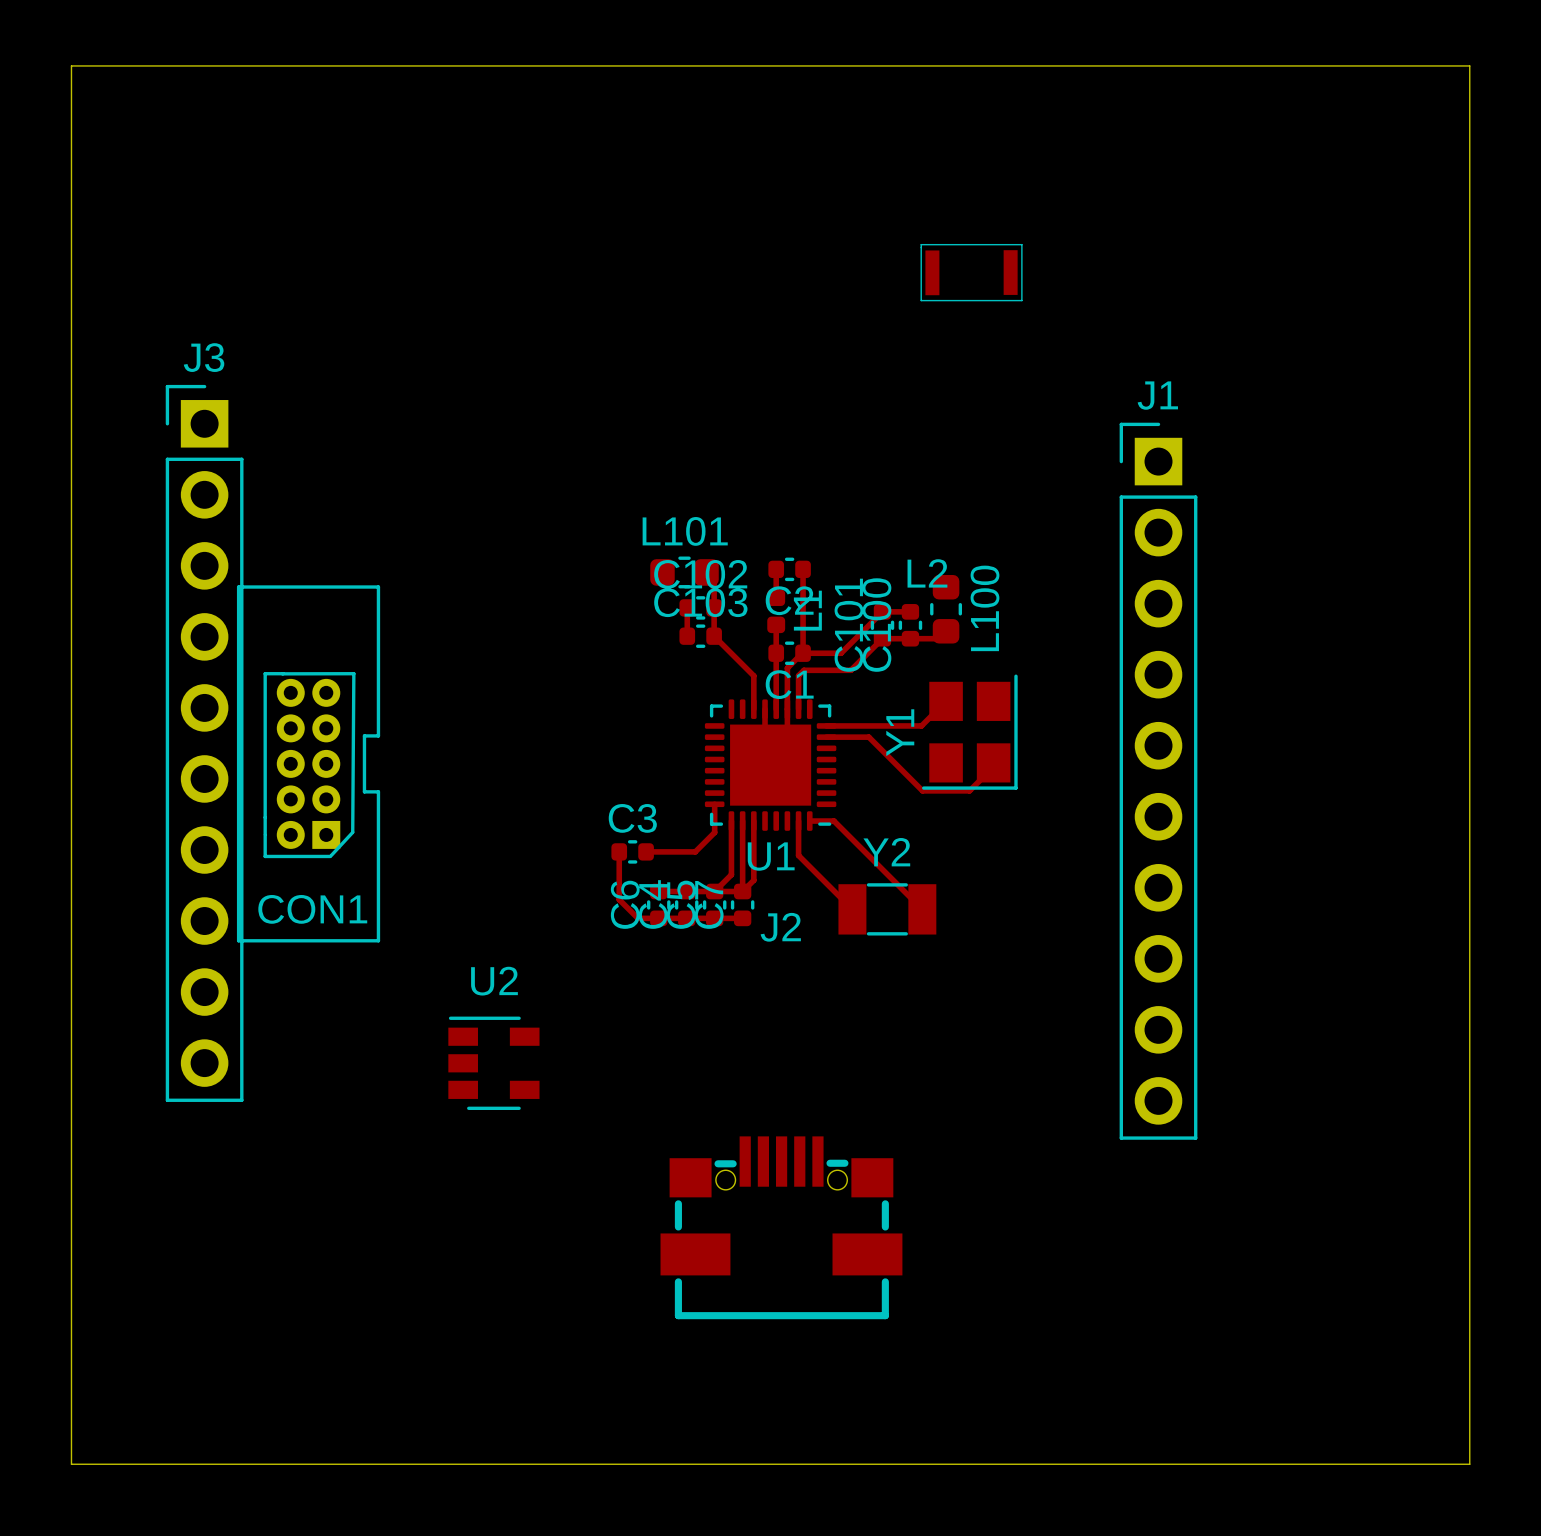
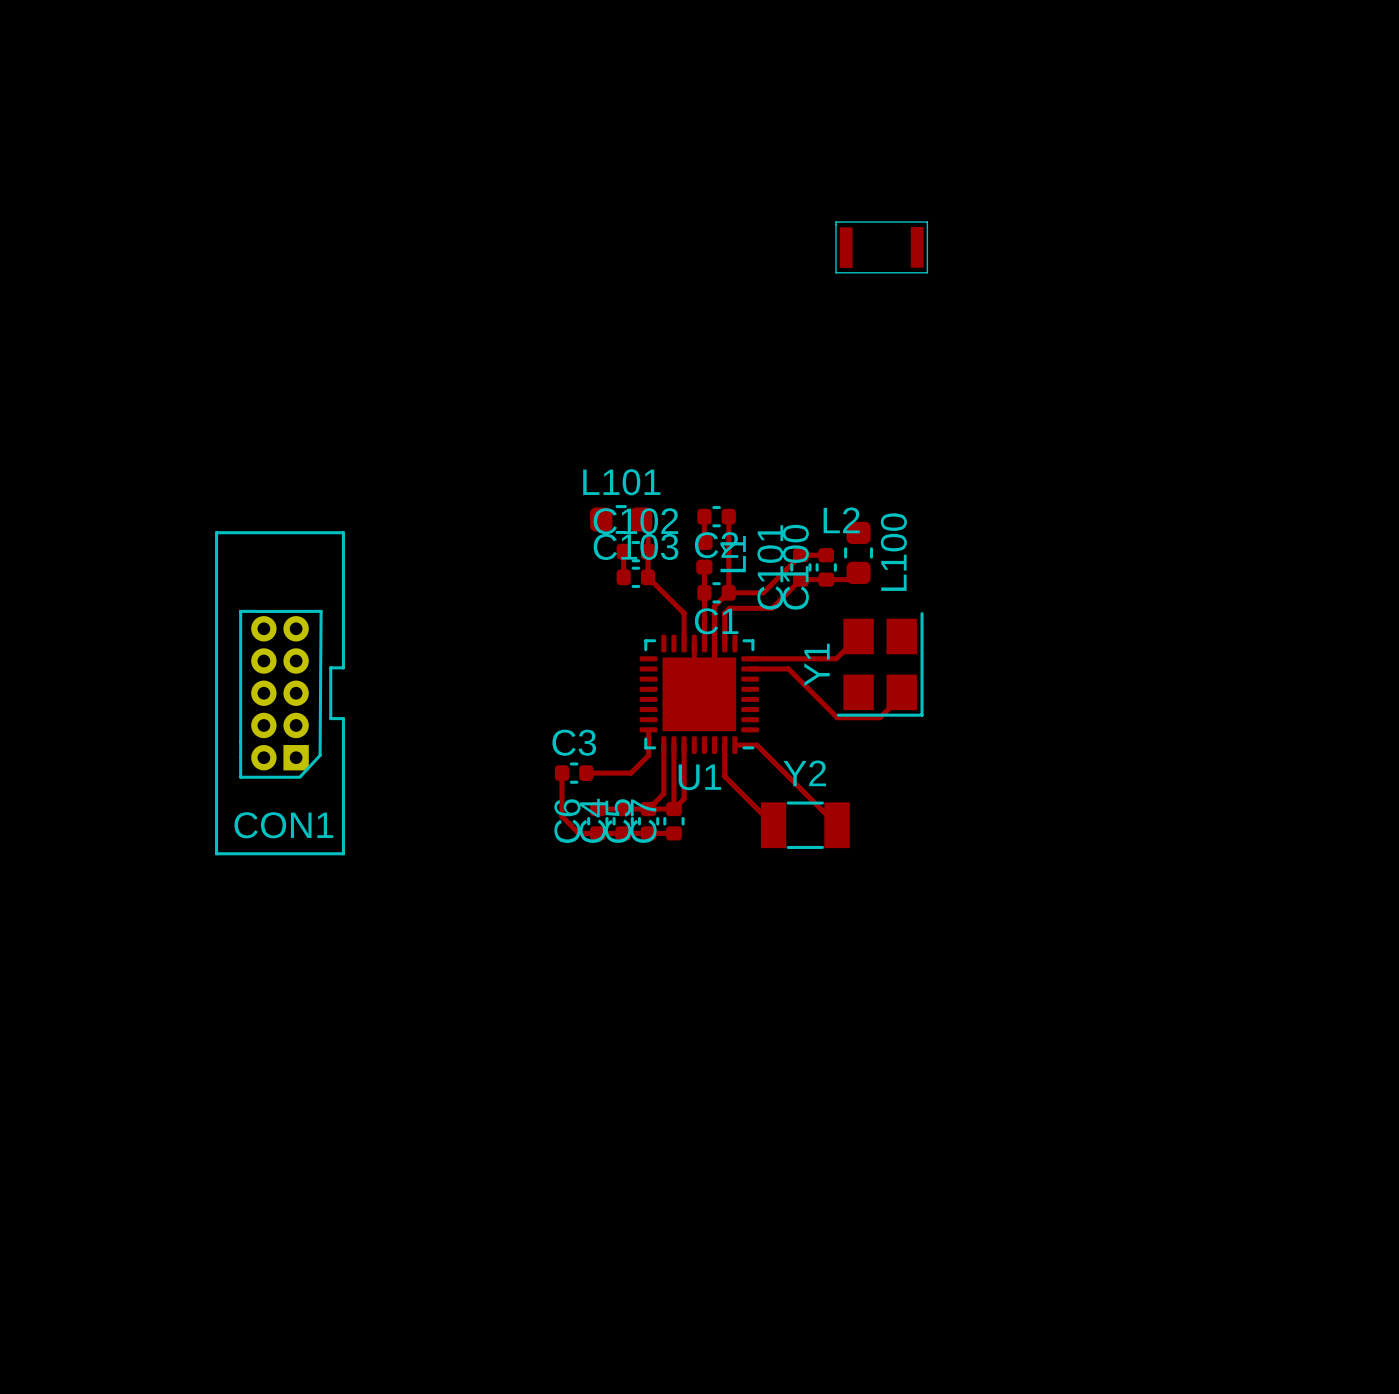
board edge: (71, 65) (71, 1464) (1469, 1464) (1469, 65) (71, 65) -> none
J3: (204, 743) -> none
J1: (1158, 781) -> none
U2: (493, 1063) -> none
J2: (781, 1227) -> none

